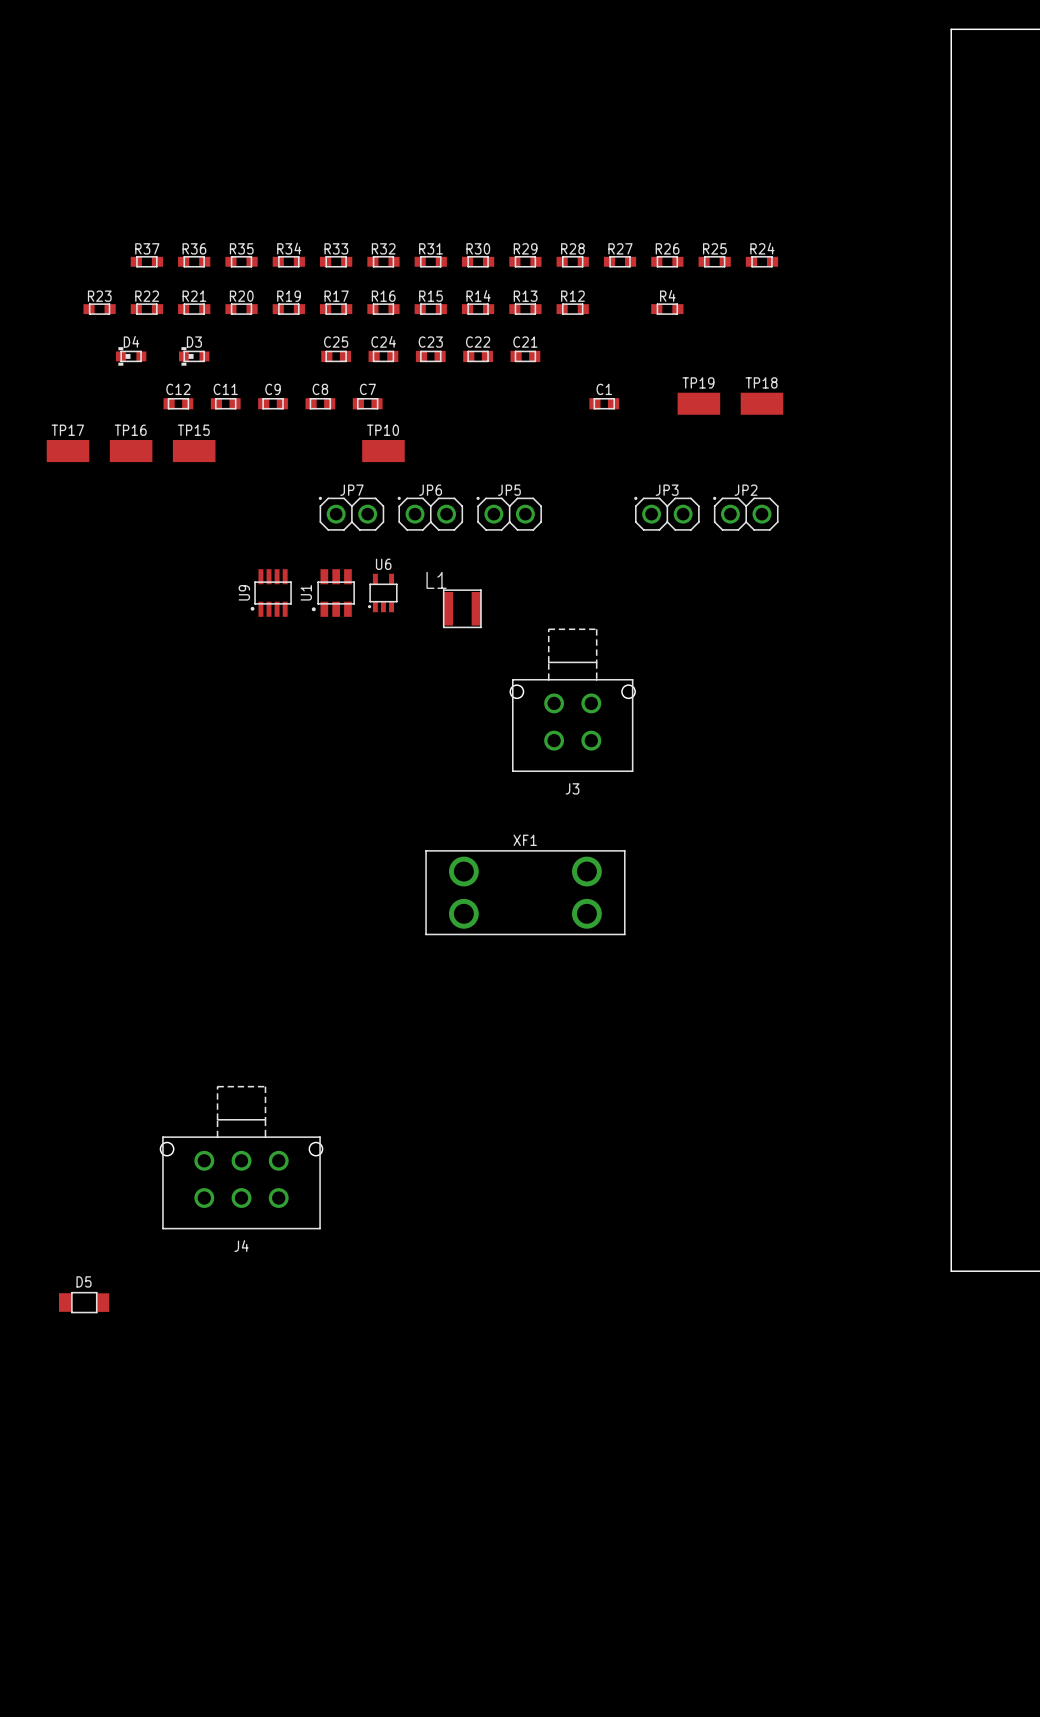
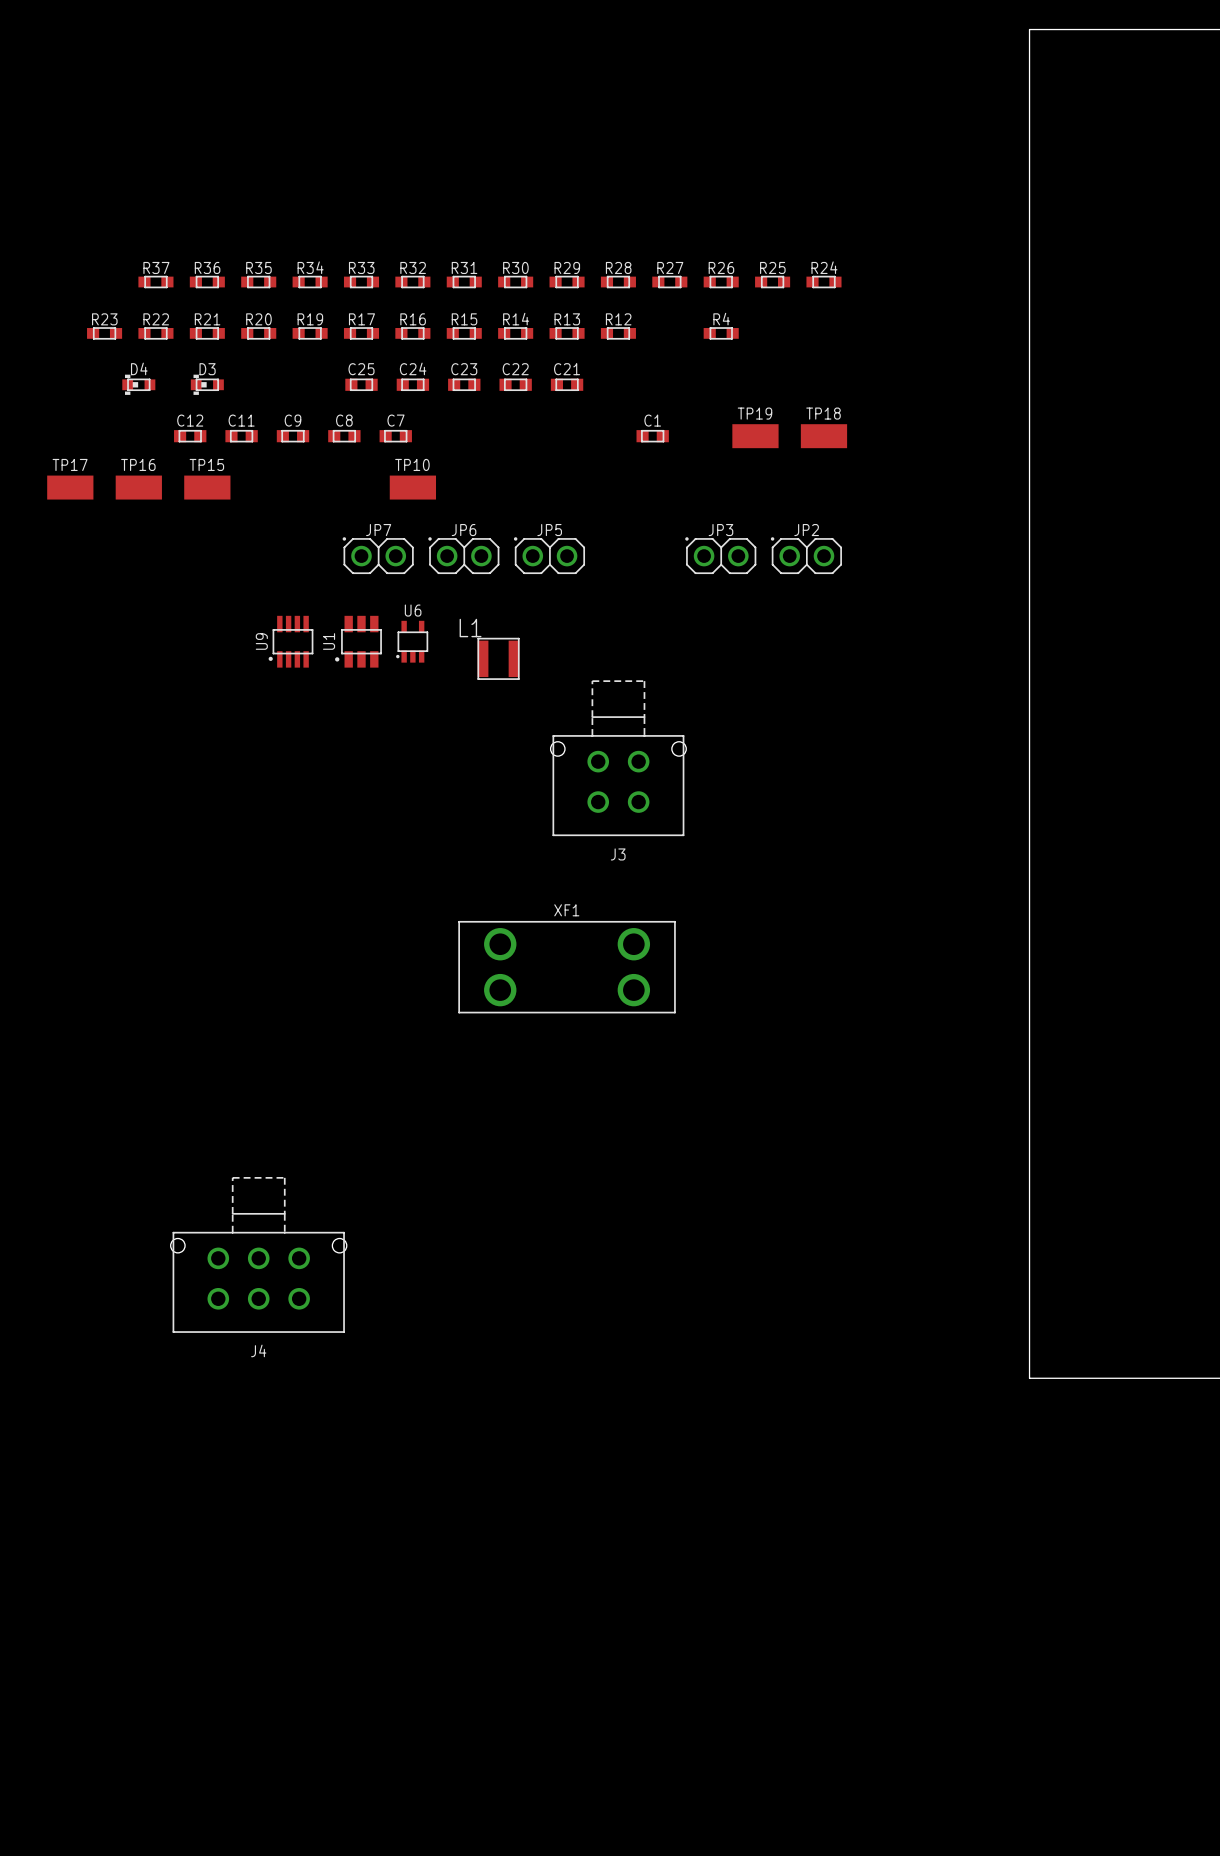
D5: (84, 1302) -> none

